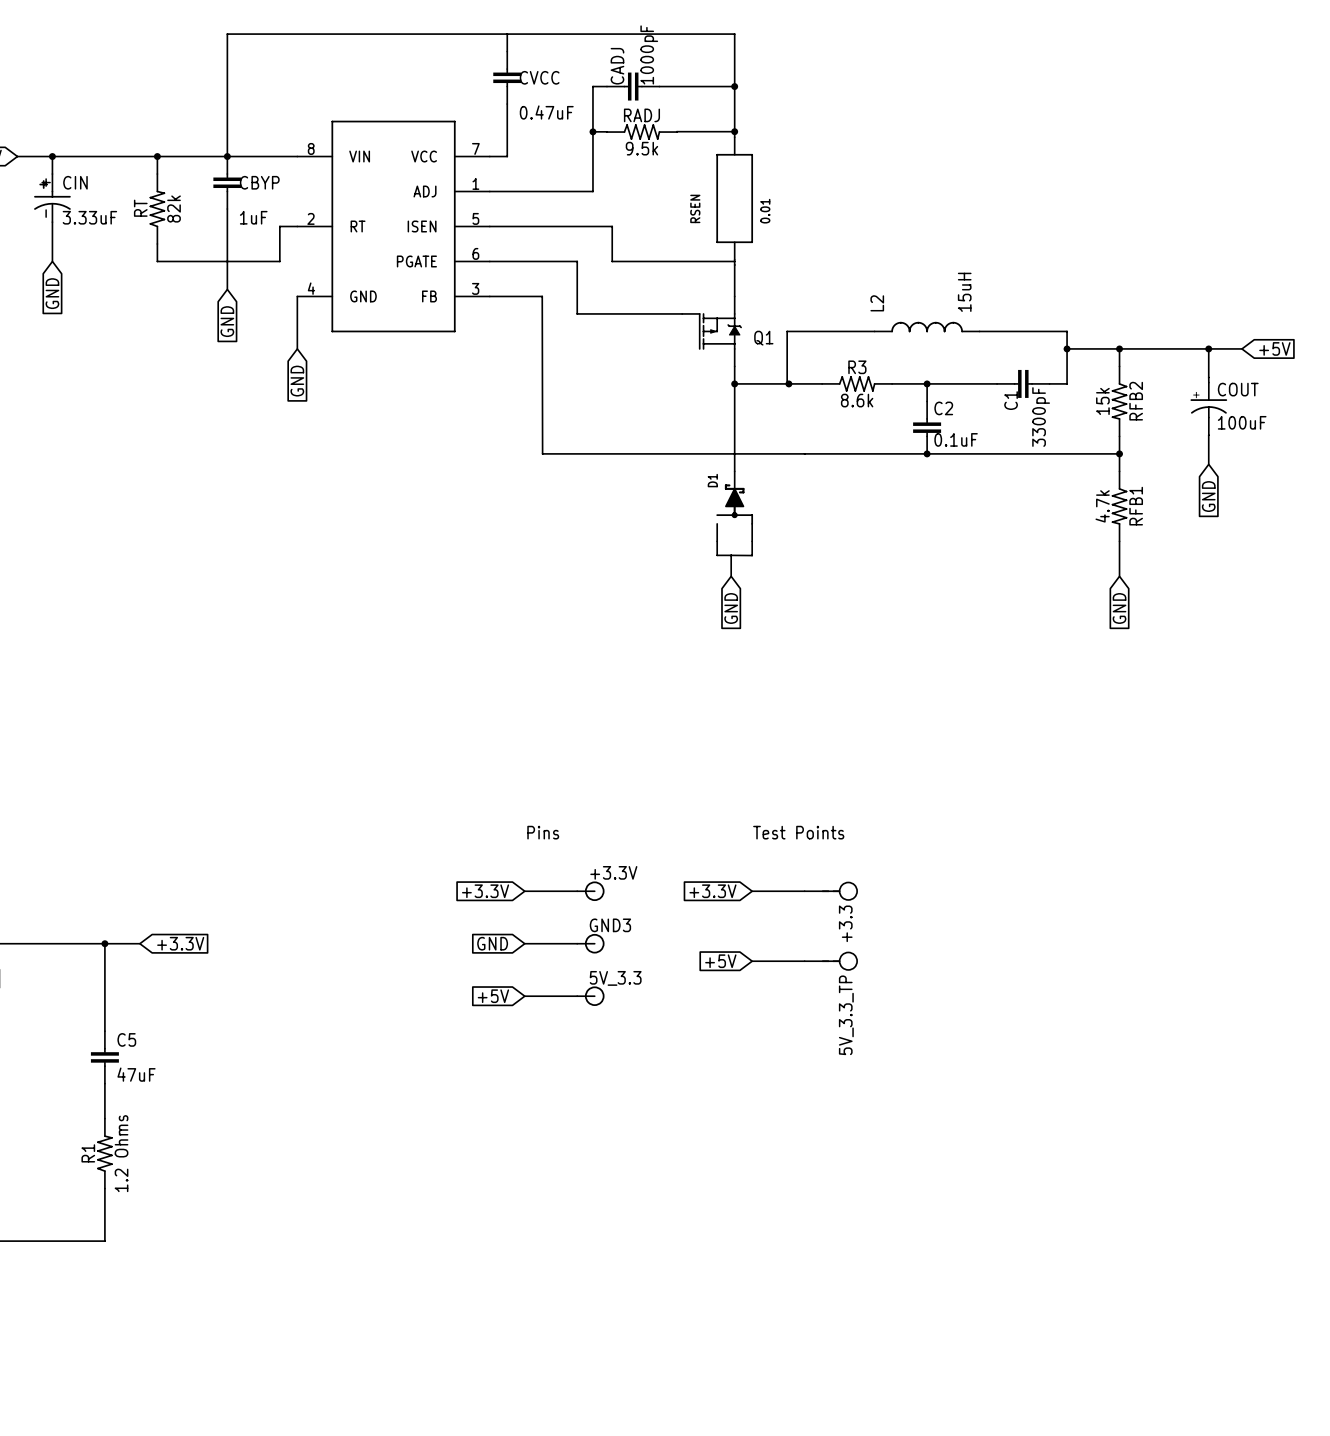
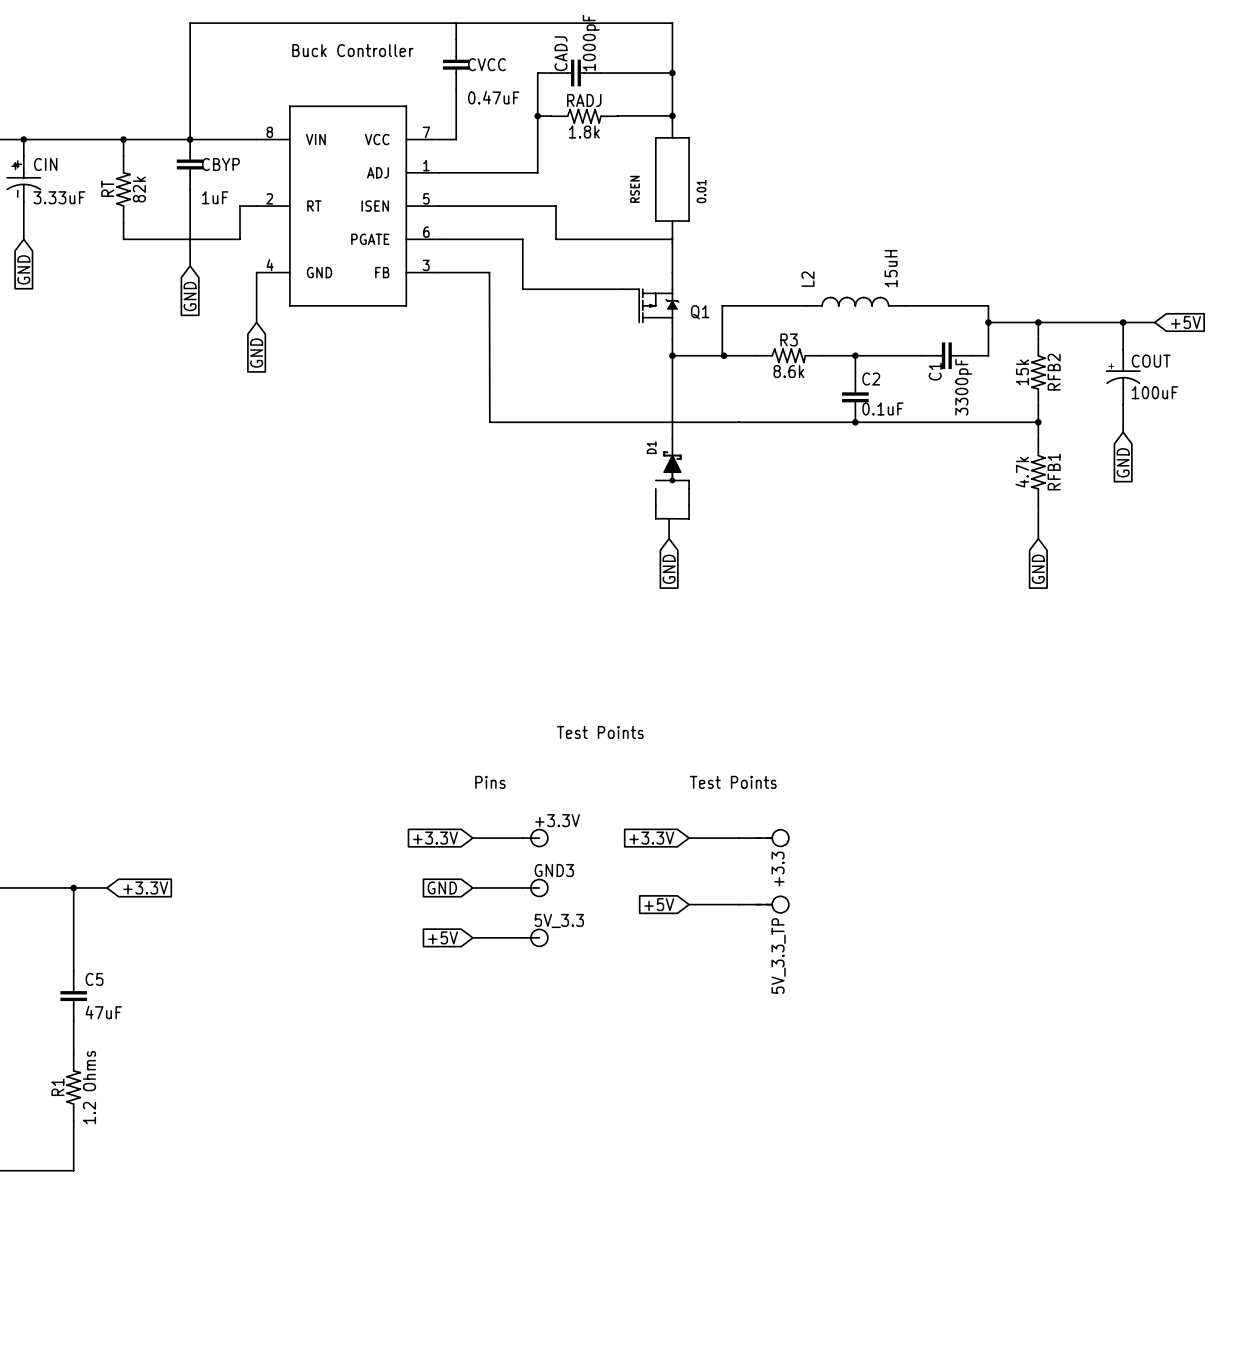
text: none -> Buck Controller (352, 50)
RADJ value: 9.5k (641, 148) -> 1.8k (584, 132)
text: none -> Test Points (600, 732)

